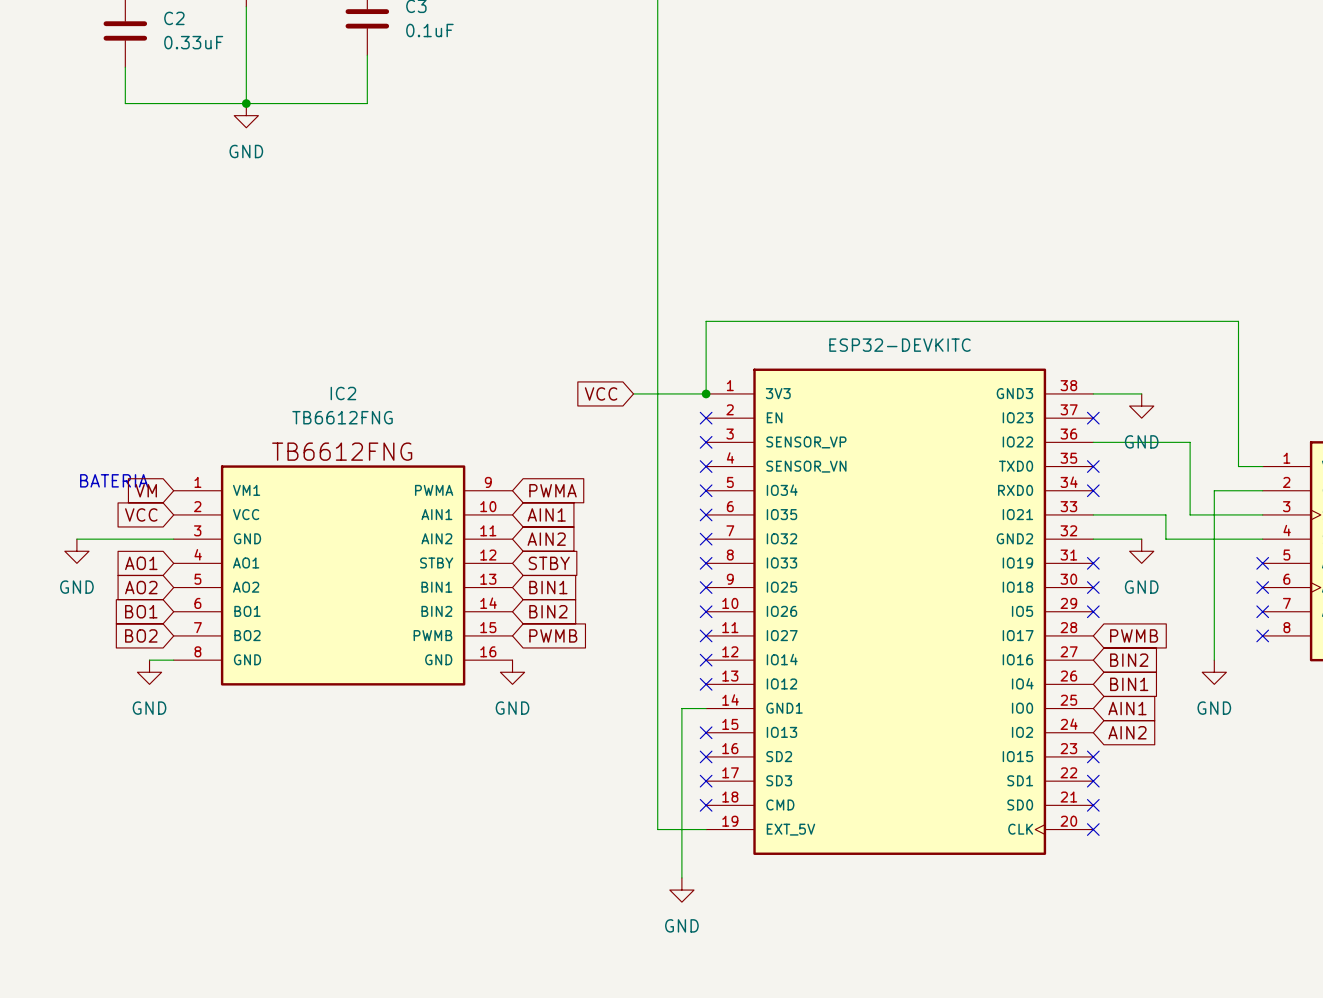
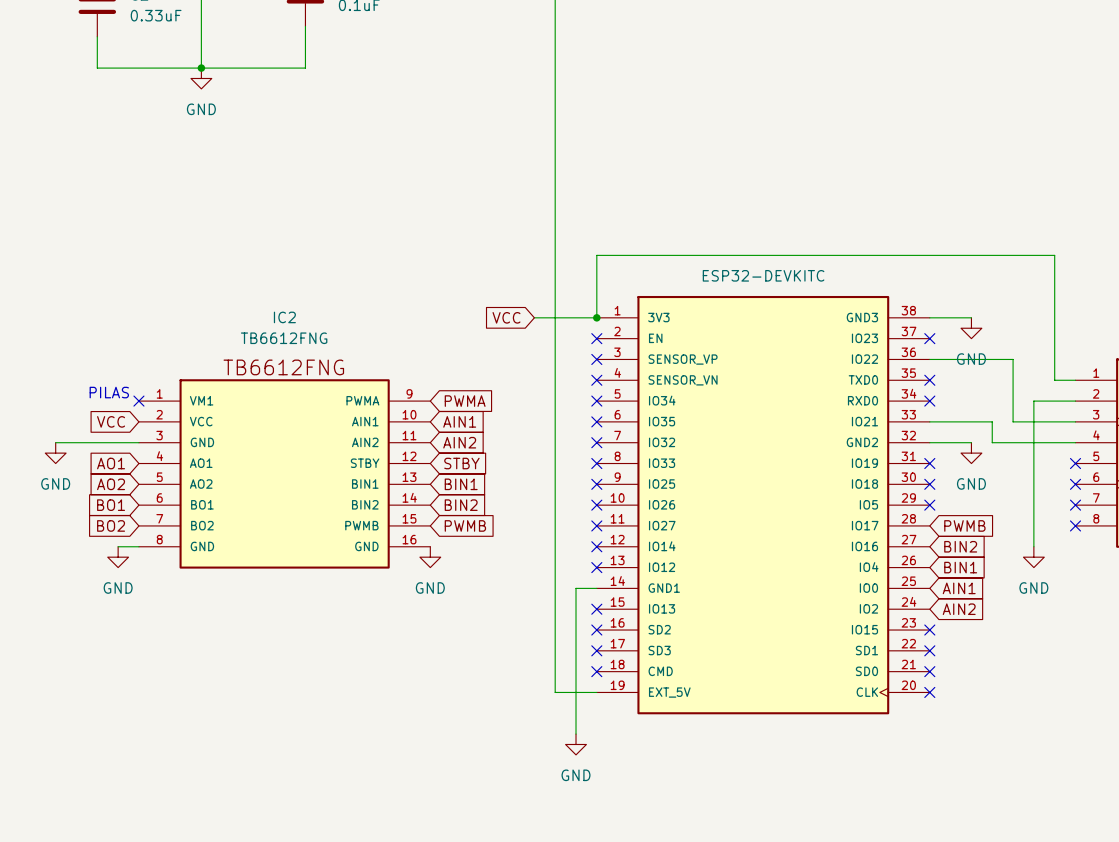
text: BATERIA (114, 480) -> none
text: none -> PILAS (109, 392)
global label: VM (146, 490) -> none
no-connect mark: none -> (138, 401)

